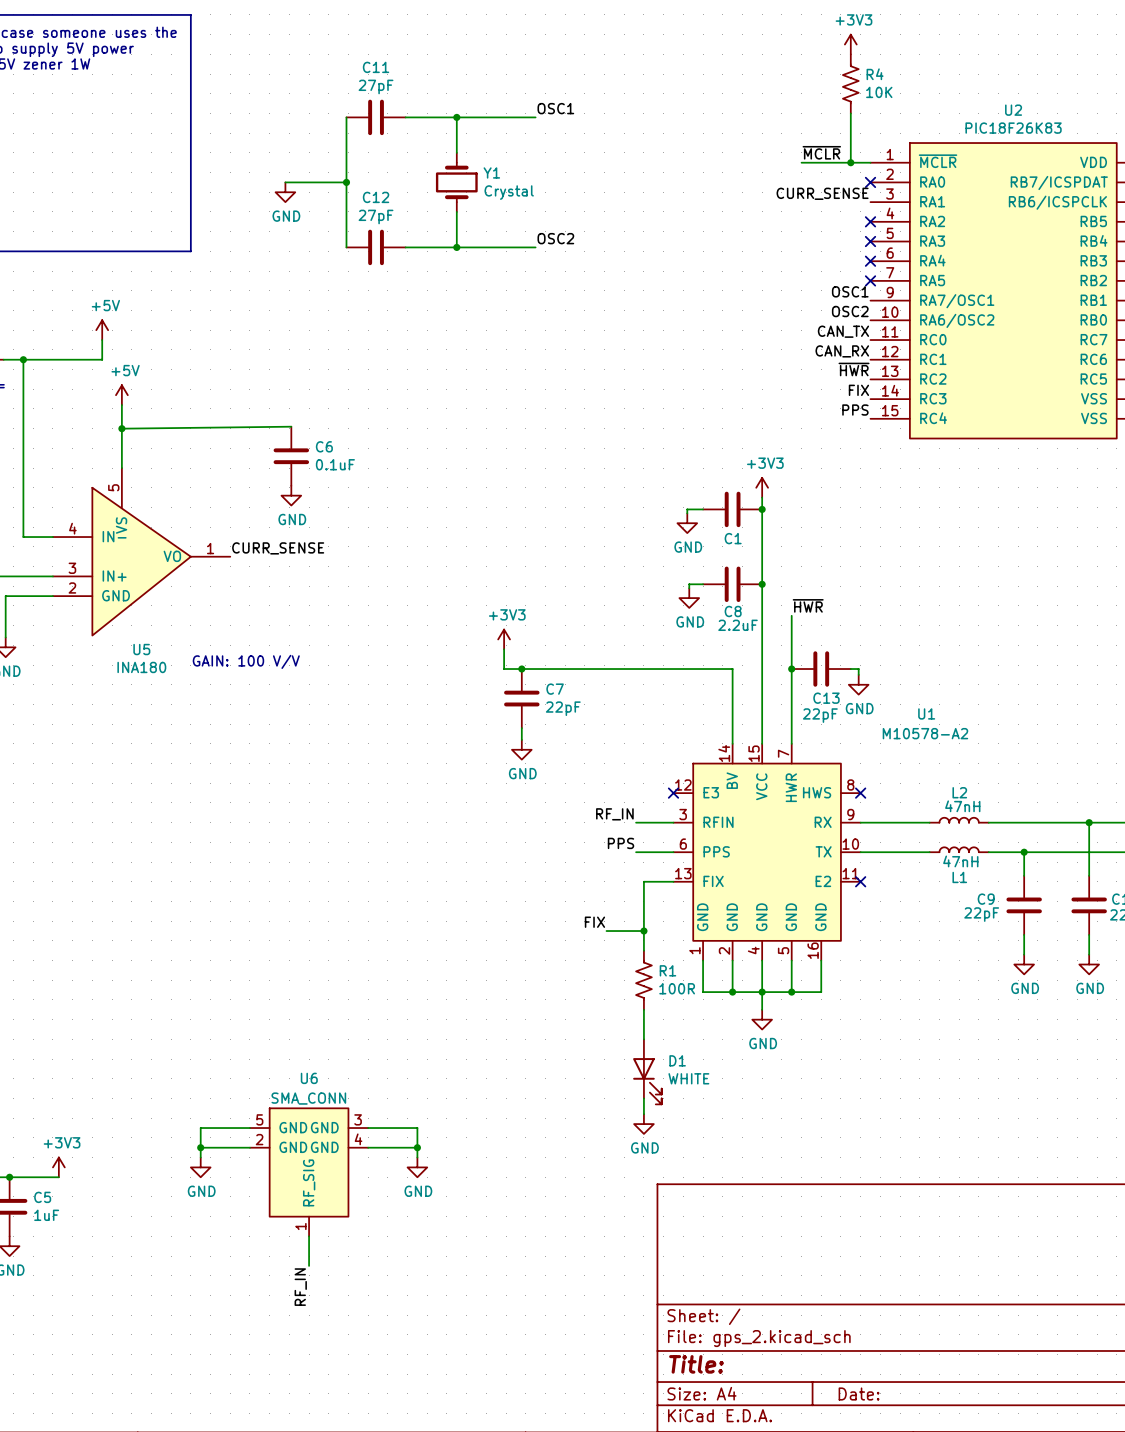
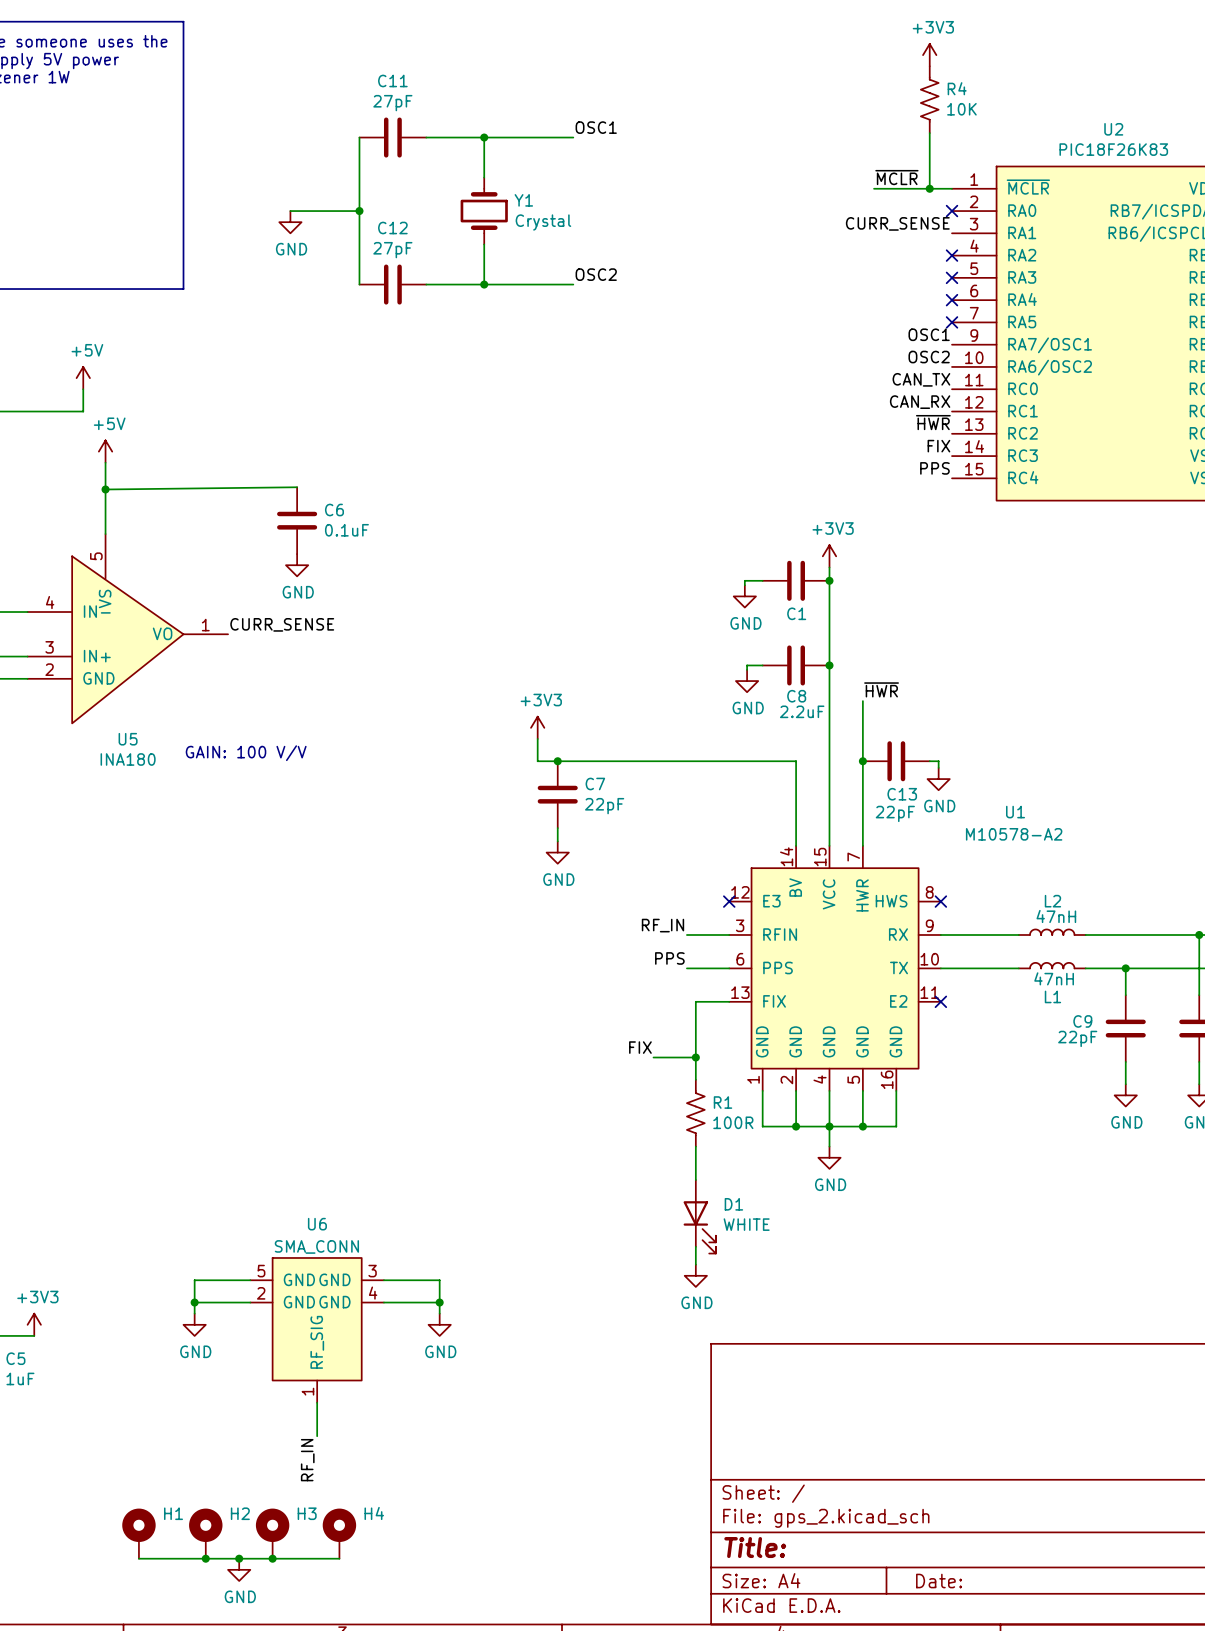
H1: none -> (138, 1533)
H2: none -> (205, 1533)
H3: none -> (272, 1533)
H4: none -> (339, 1533)
wire: none -> (138, 1558) (339, 1558)
junction: none -> (205, 1558)
junction: none -> (239, 1558)
junction: none -> (272, 1558)
power symbol: none -> GND (239, 1569)

